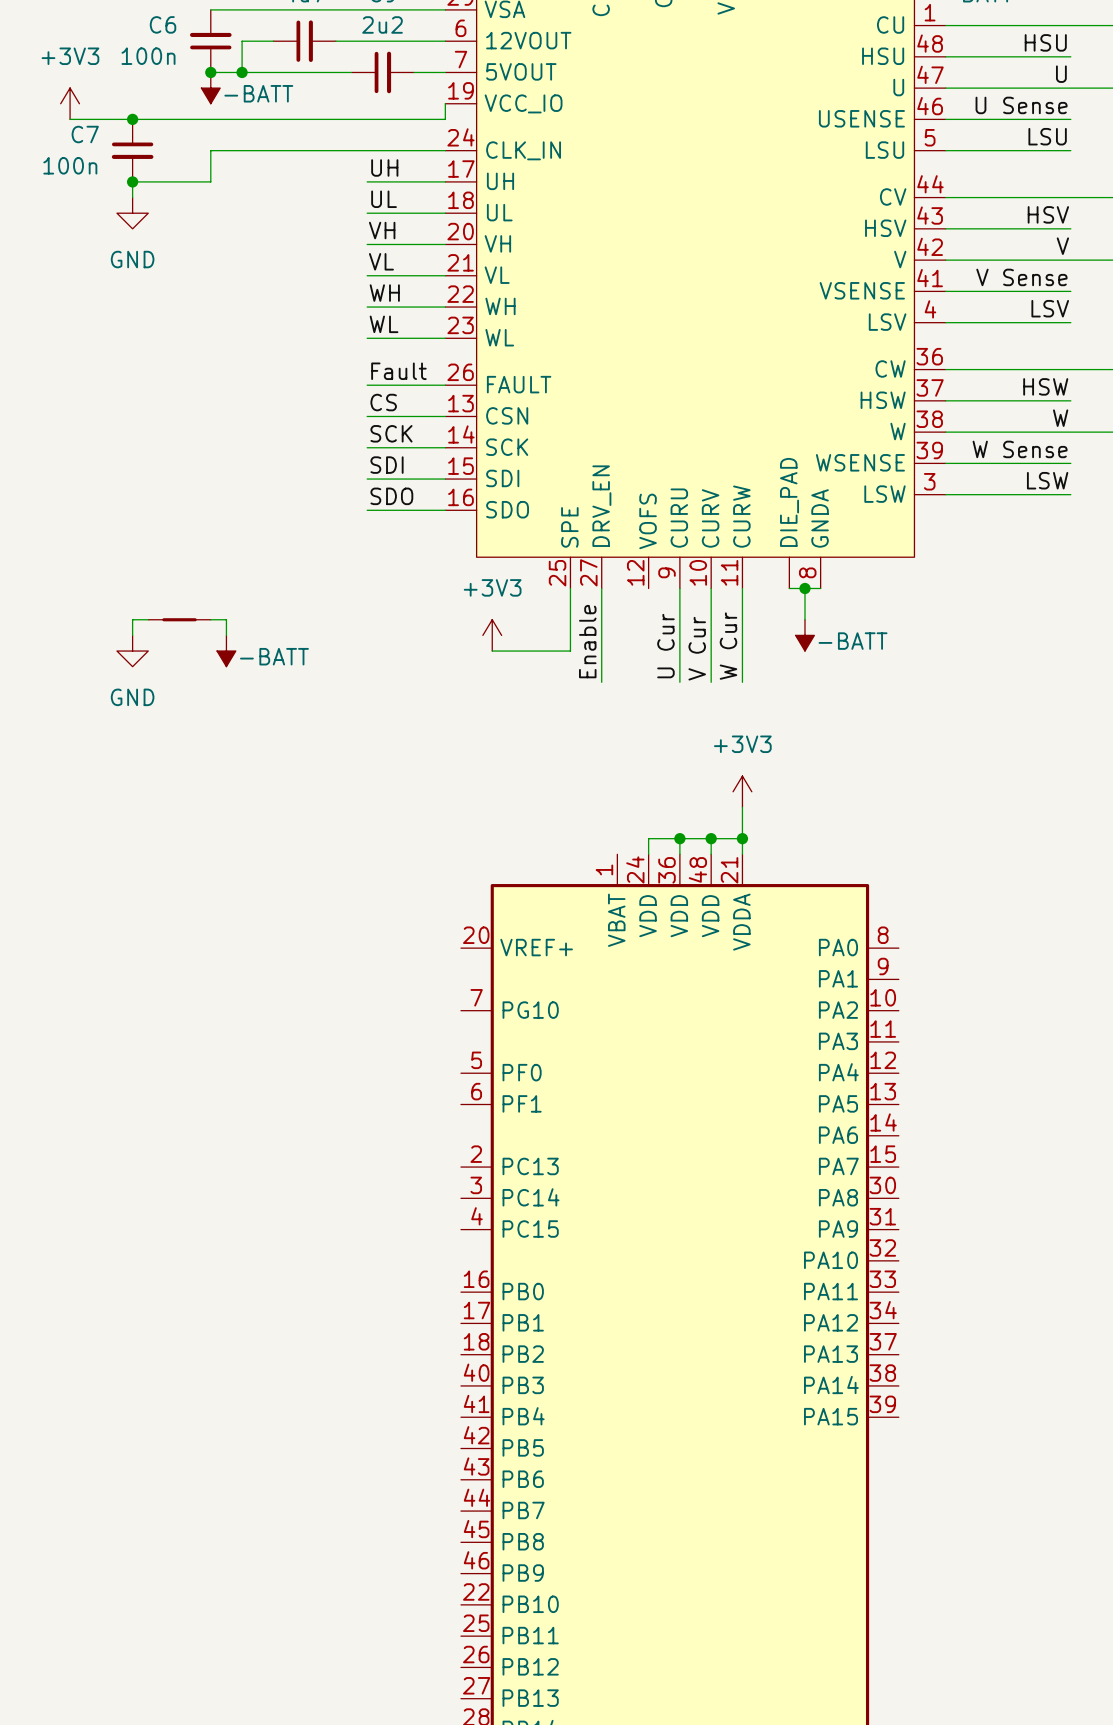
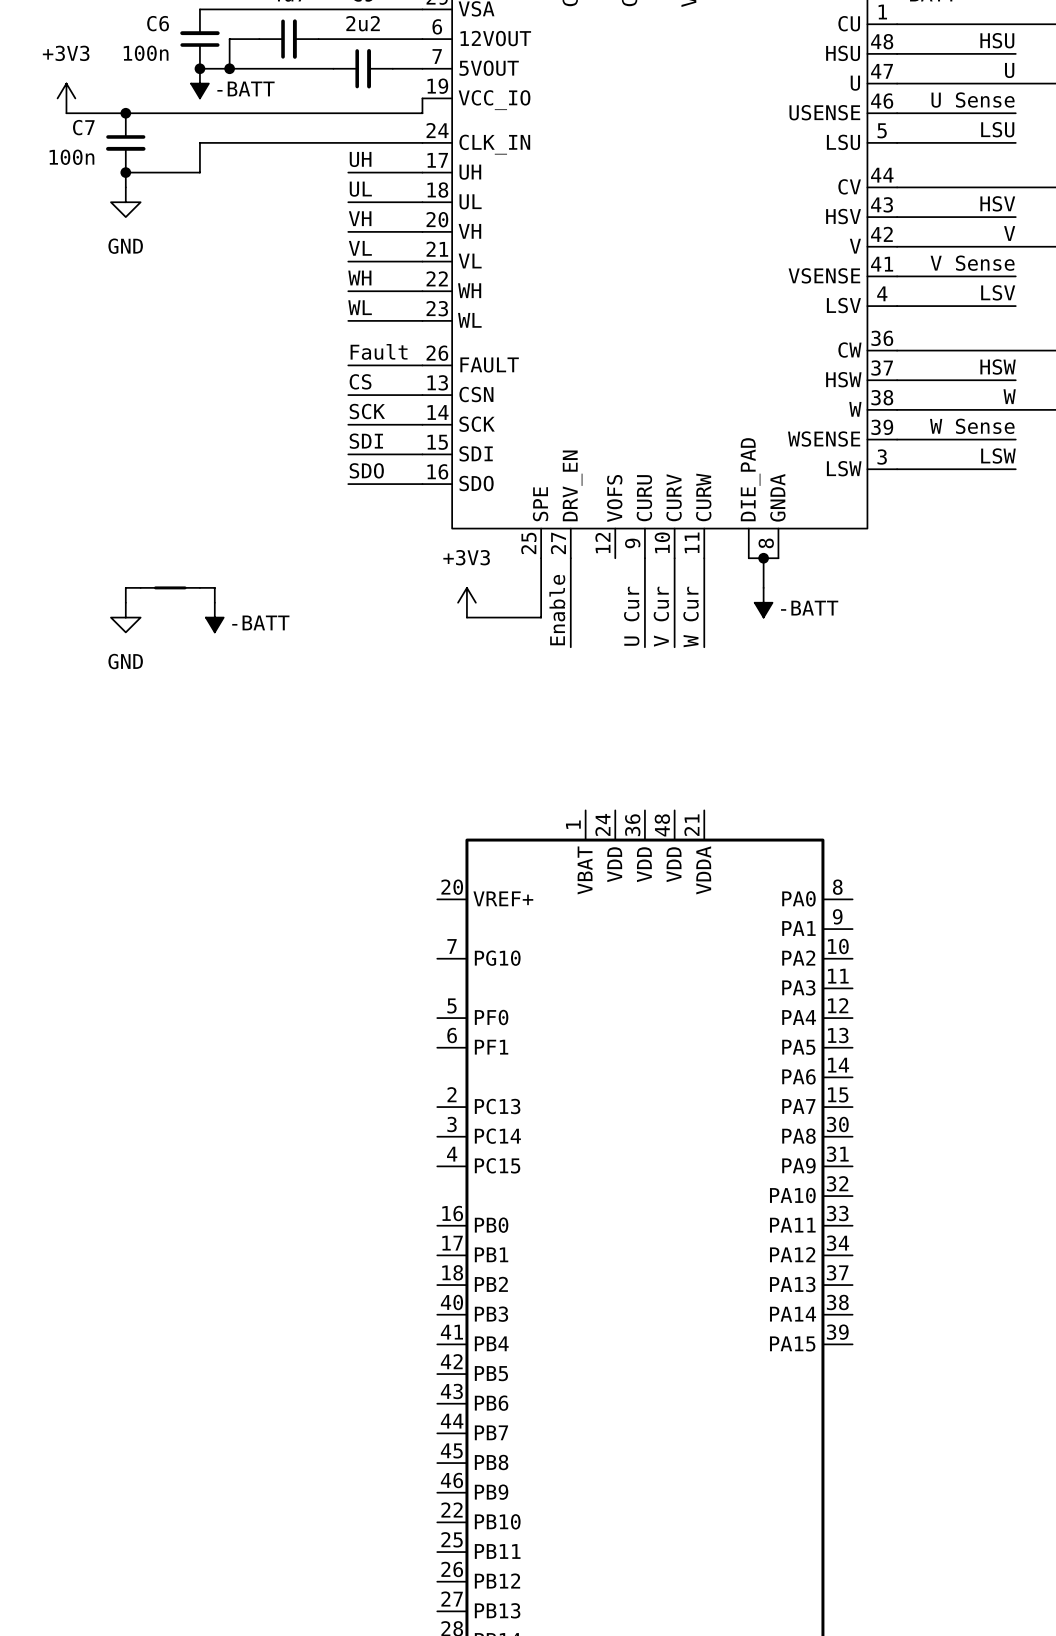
power symbol: +3V3 (742, 791) -> none
wire: (742, 807) (742, 854) -> none
wire: (679, 838) (679, 854) -> none
junction: (679, 838) -> none
wire: (711, 838) (711, 854) -> none
junction: (711, 838) -> none
wire: (742, 838) (648, 838) (648, 854) -> none
junction: (742, 838) -> none

